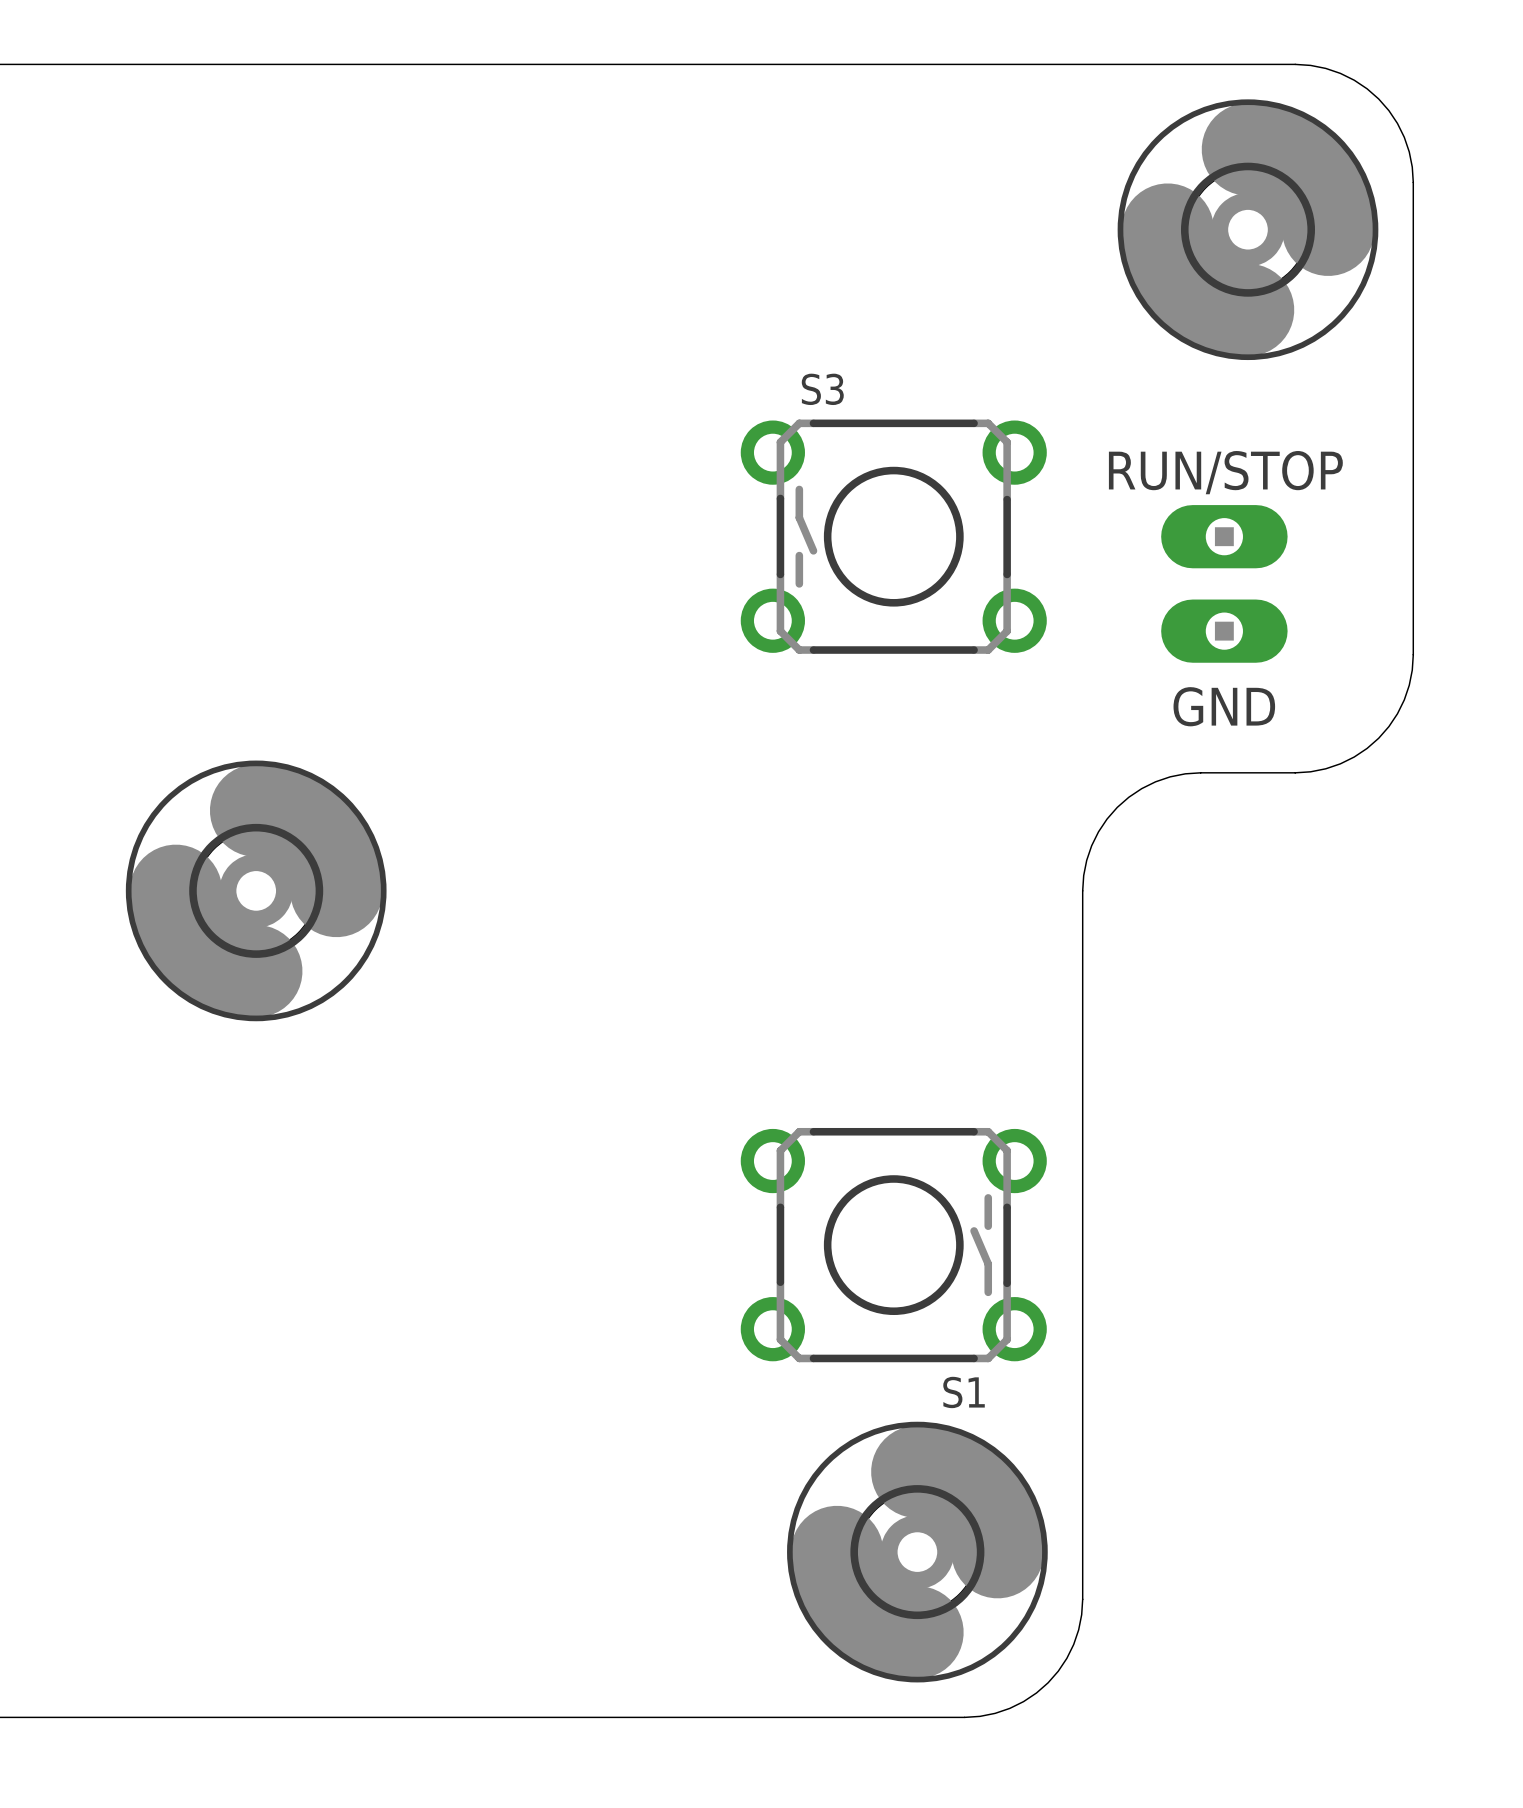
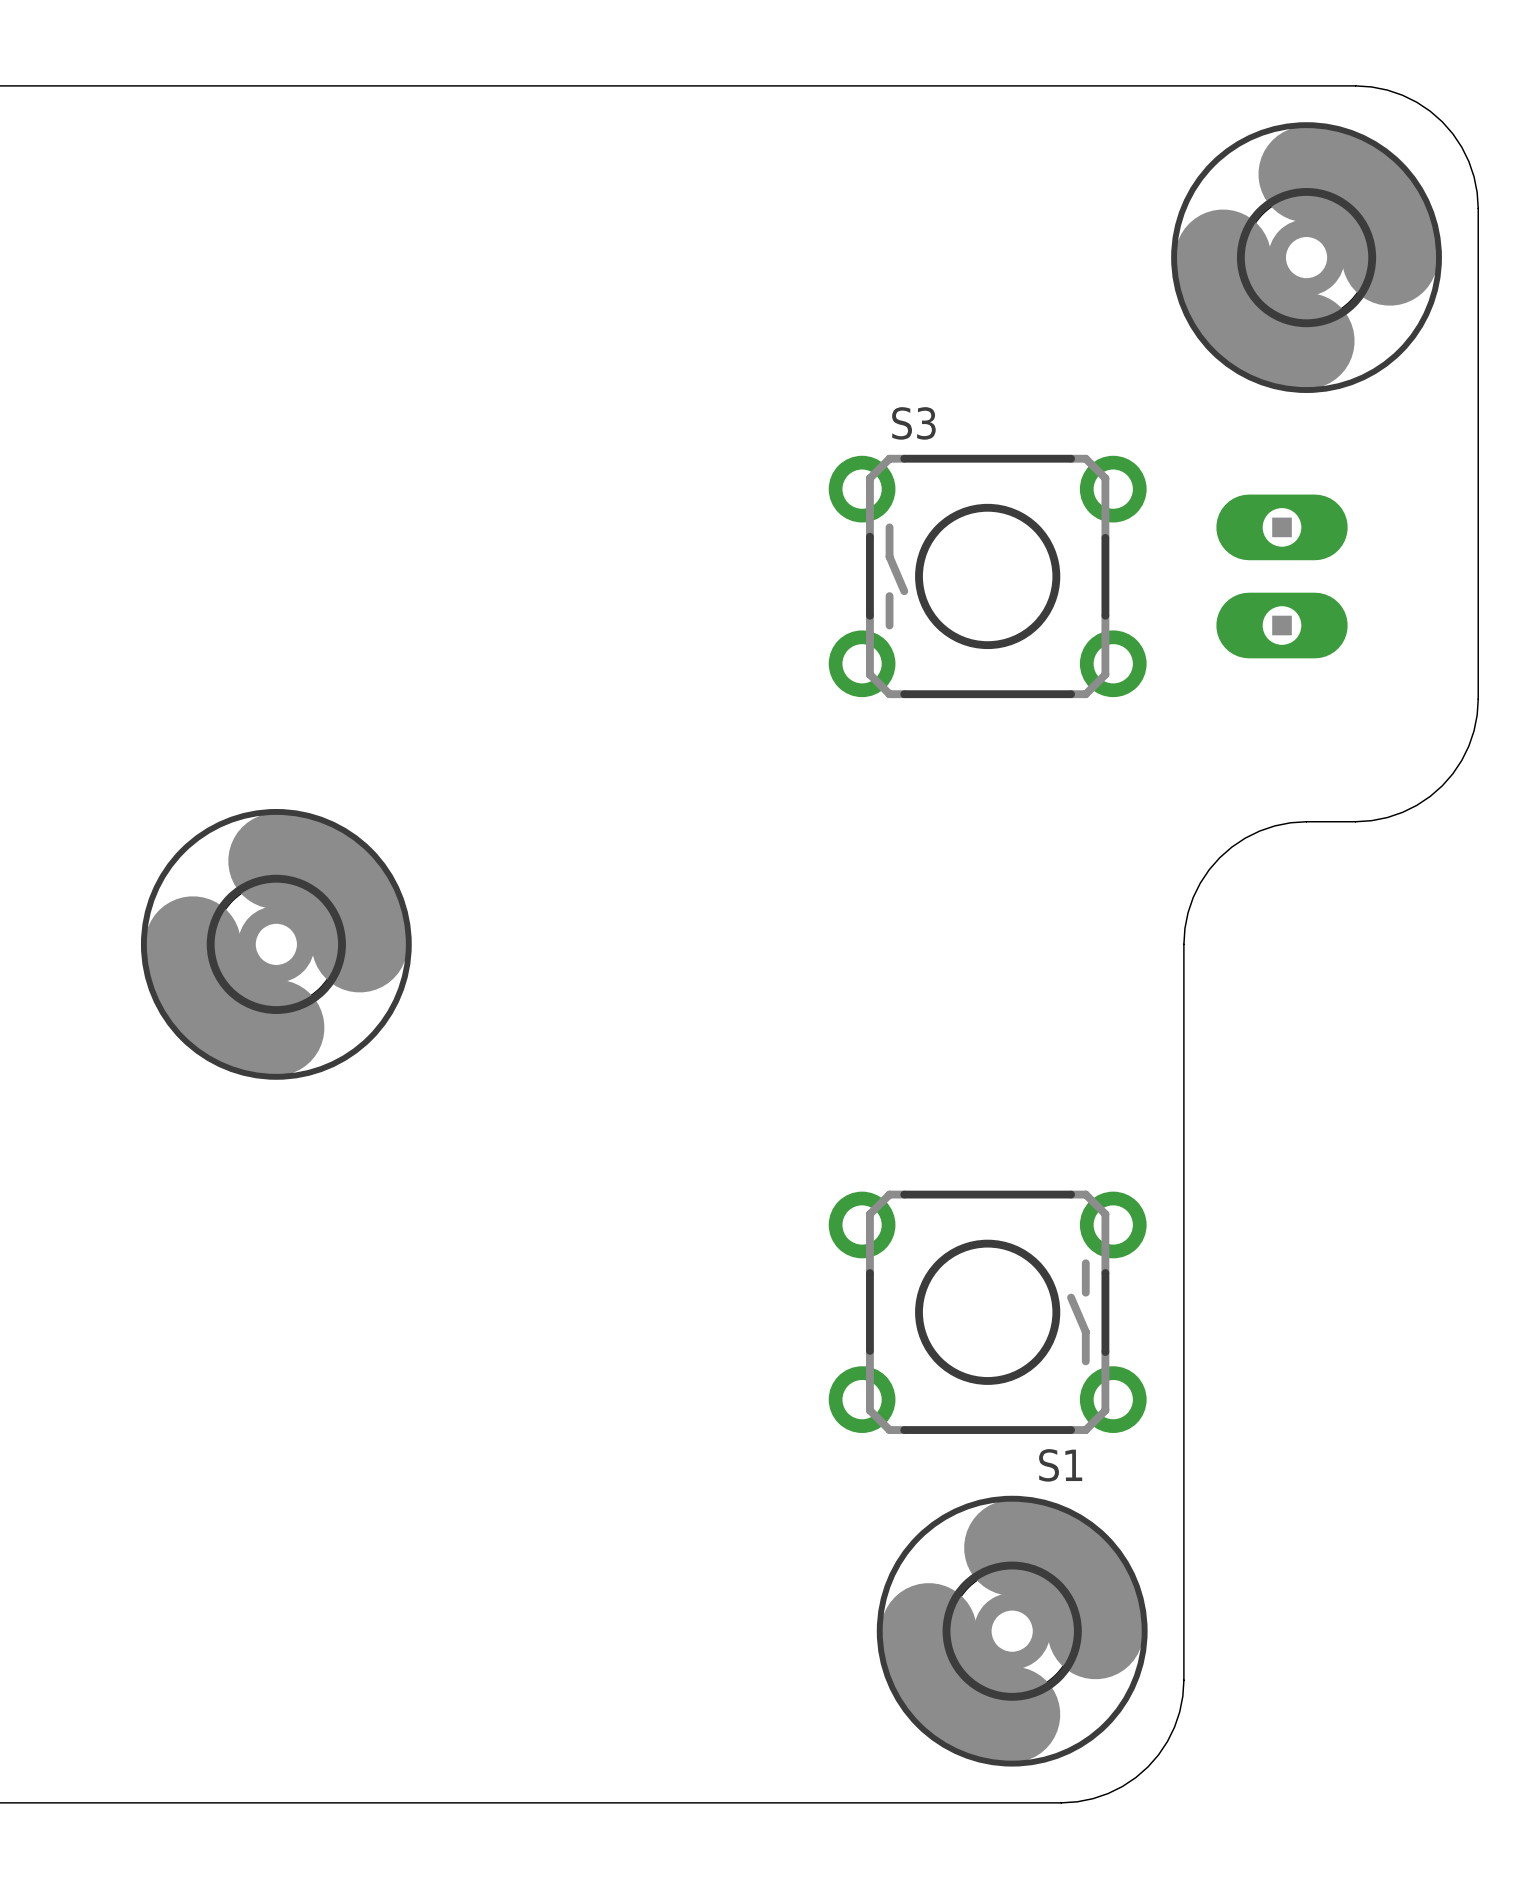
text: RUN/STOP (1225, 472) -> none
S3 position: (893, 536) -> (987, 576)
part position: (1224, 583) -> (1282, 576)
text: GND (1224, 706) -> none
board edge: (1247, 772) (1185, 773) (1170, 776) (1141, 788) (1117, 807) (1107, 819) (1098, 831) (1086, 860) (1082, 890) (1081, 1614) (1073, 1644) (1066, 1658) (1048, 1682) (1023, 1701) (1009, 1708) (995, 1713) (964, 1717) -> (1306, 821) (1274, 825) (1259, 831) (1245, 838) (1219, 857) (1200, 883) (1193, 897) (1184, 928) (1183, 1680) (1179, 1711) (1167, 1741) (1158, 1754) (1147, 1766) (1122, 1786) (1093, 1798) (1077, 1801) (1012, 1802)
S1 position: (893, 1245) -> (987, 1312)
part position: (917, 1552) -> (1012, 1631)

